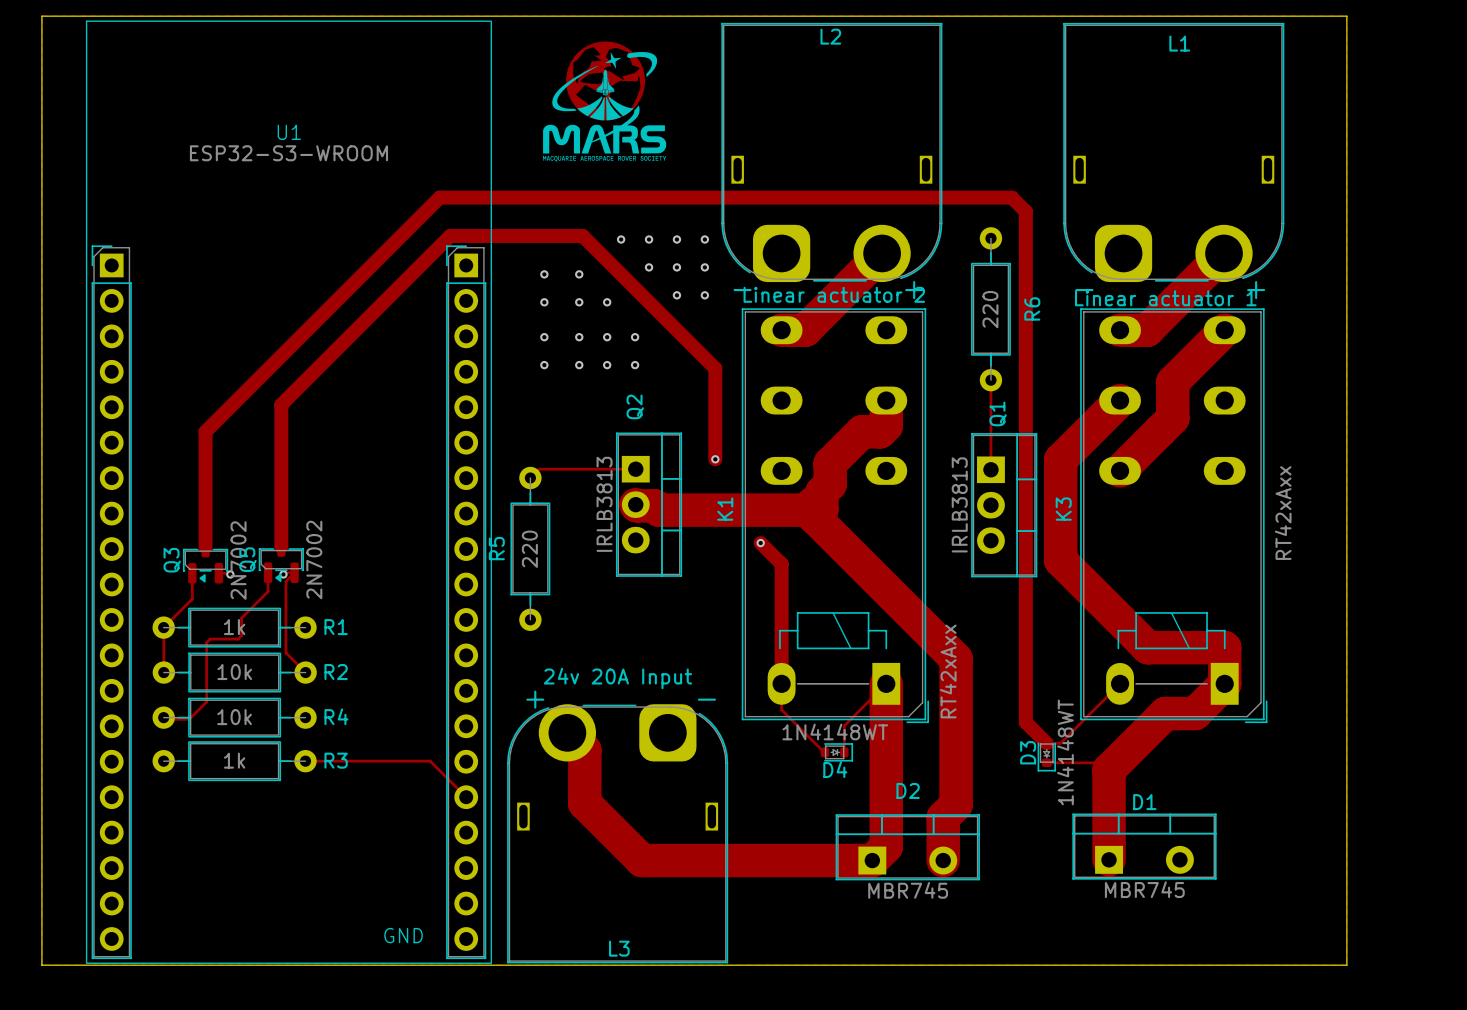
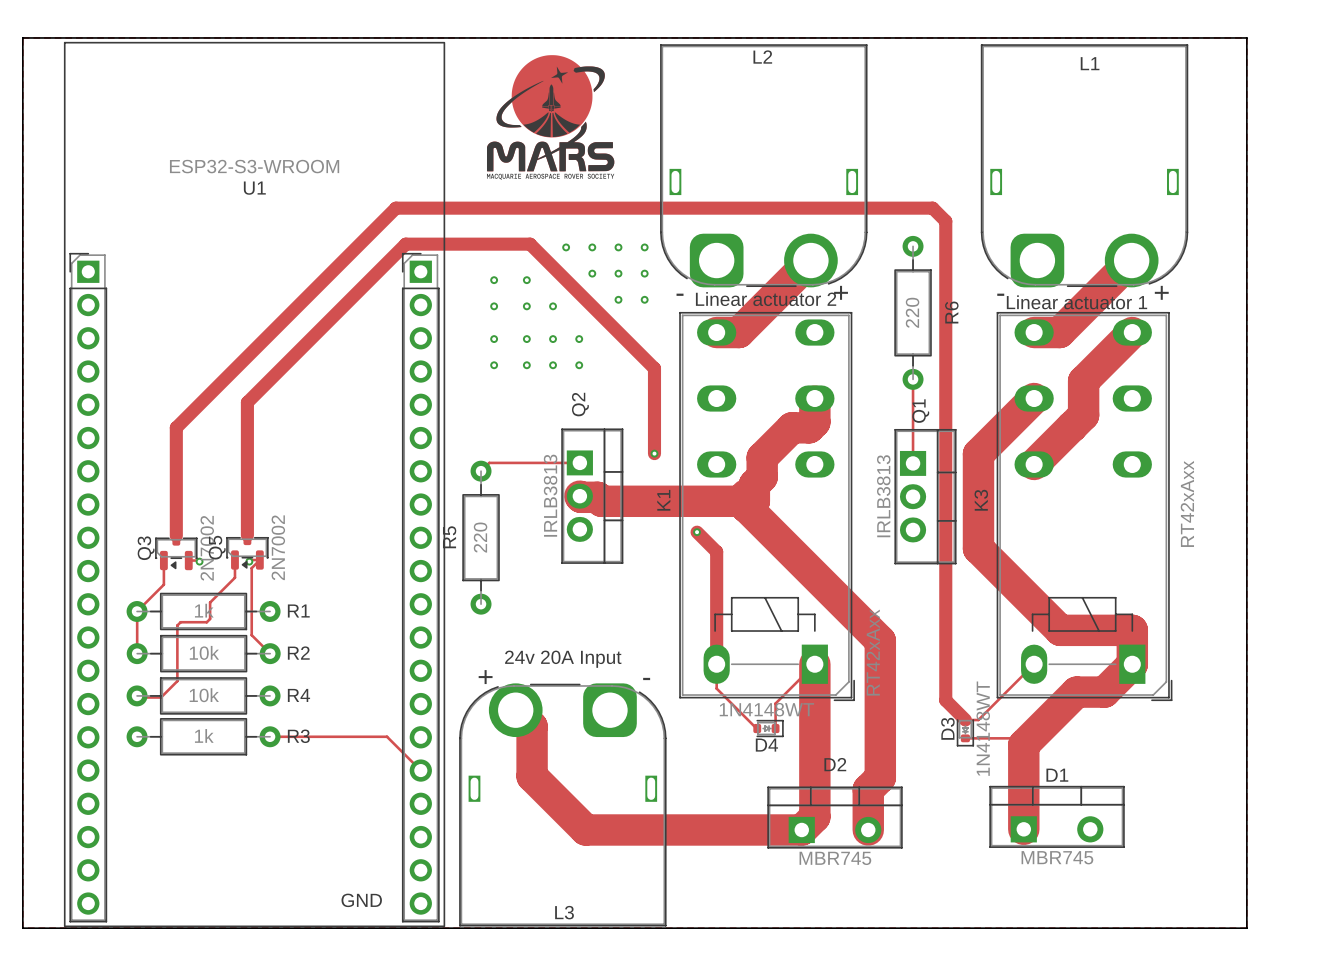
drawing shape: [543, 41, 667, 162] -> [486, 55, 615, 180]
U1 name position: U1 (289, 132) -> U1 (254, 188)

